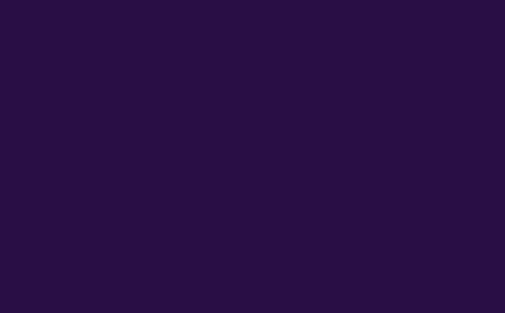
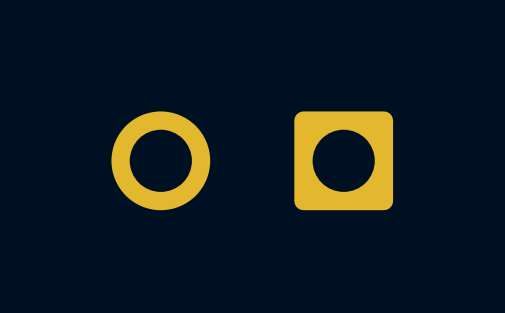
part: none -> (252, 160)

